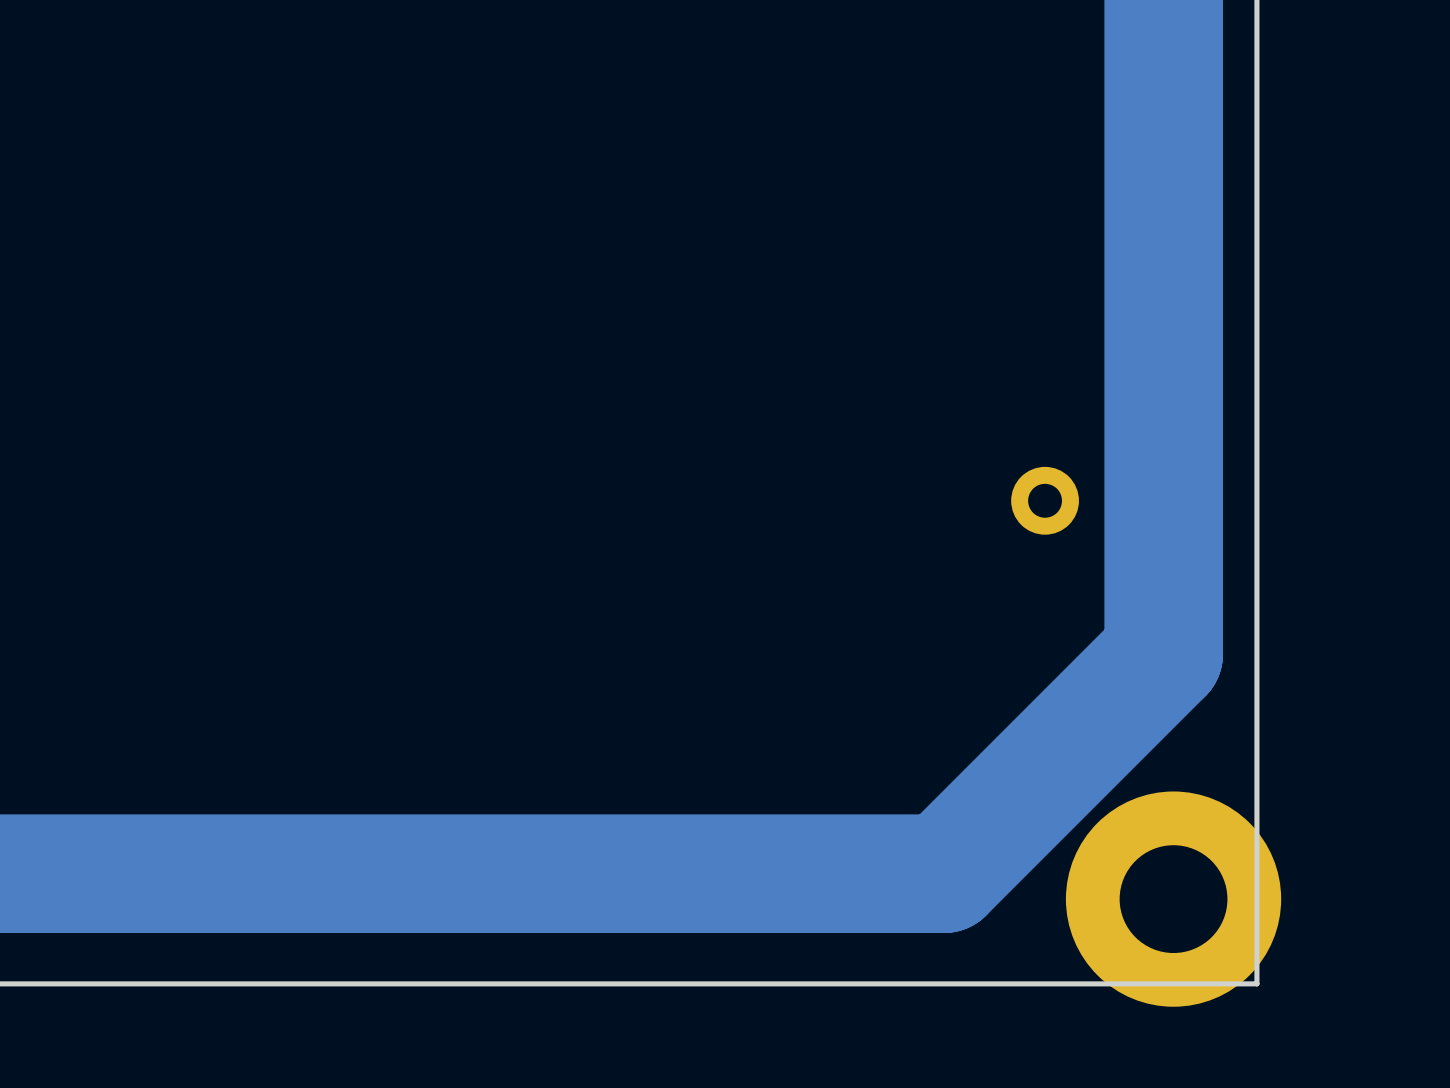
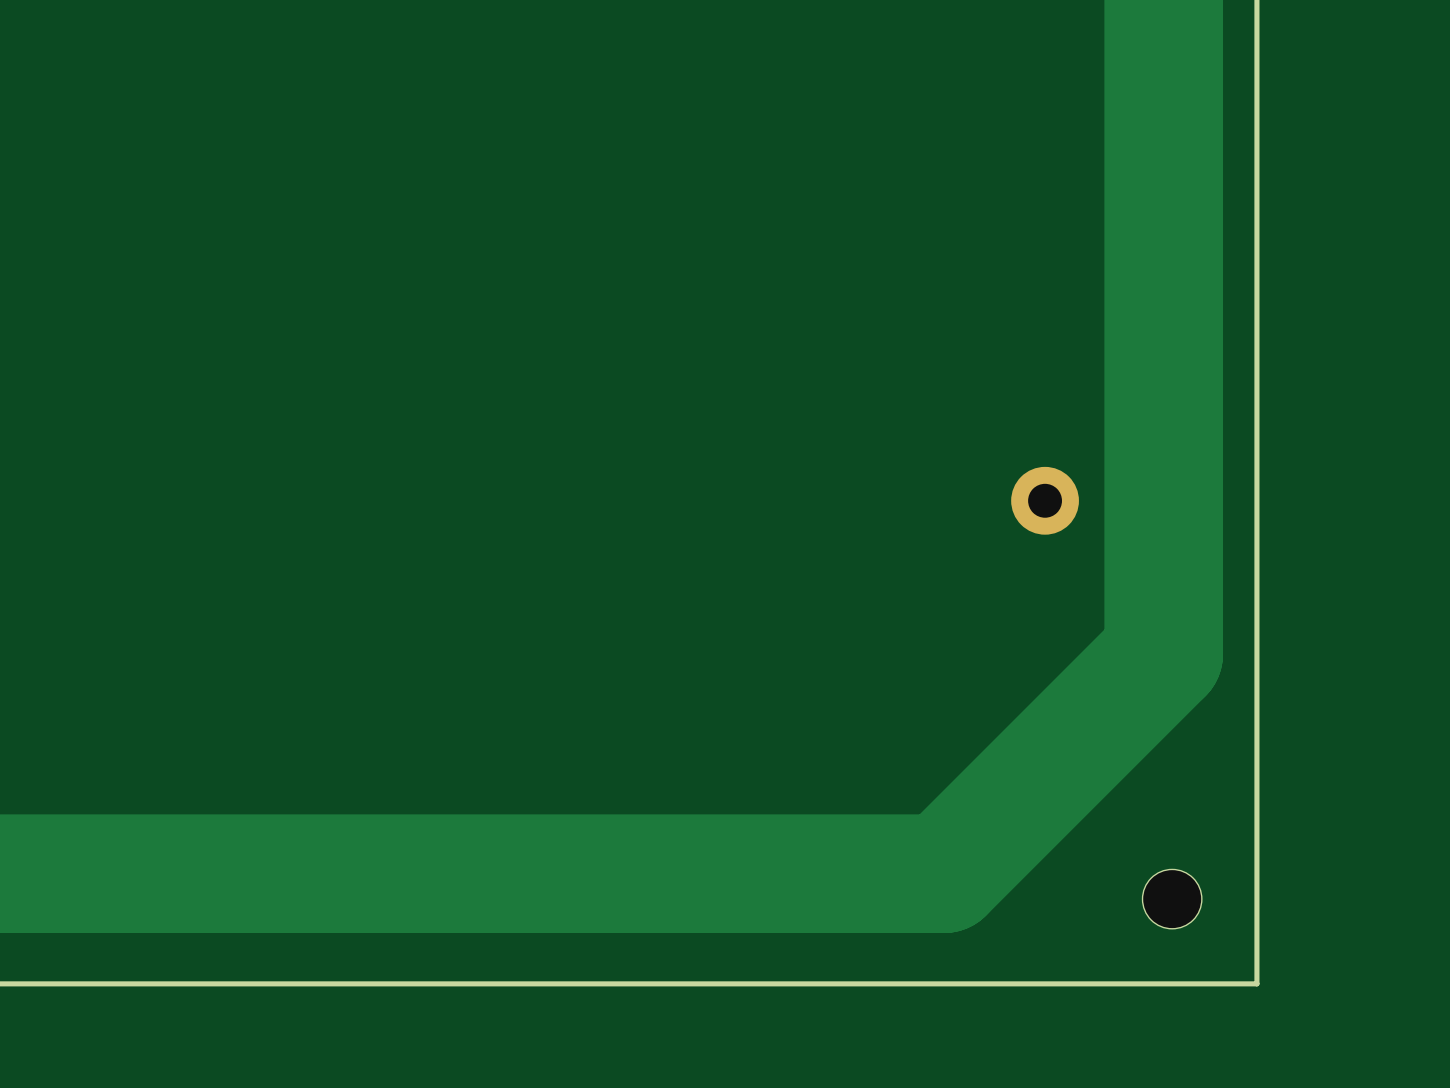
part footprint: [1065, 791, 1282, 1007] -> [1142, 869, 1202, 929]

